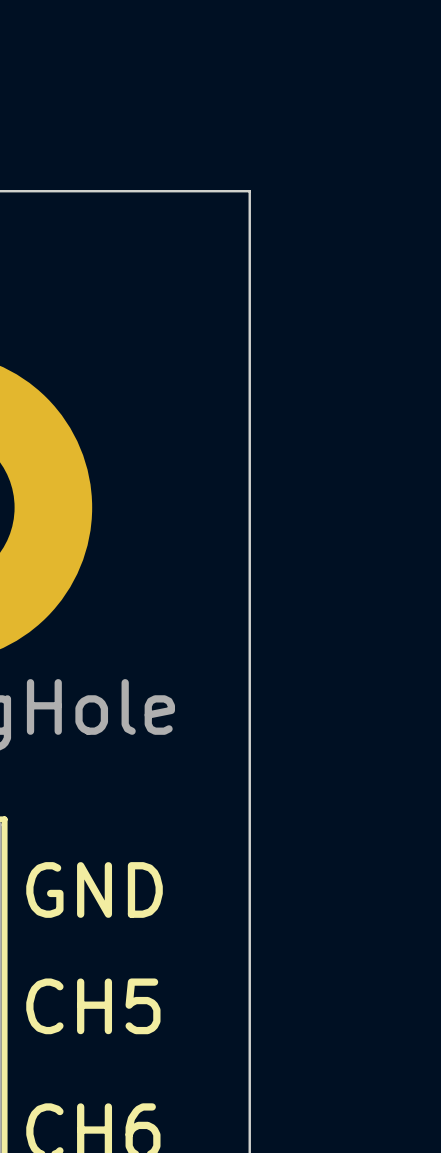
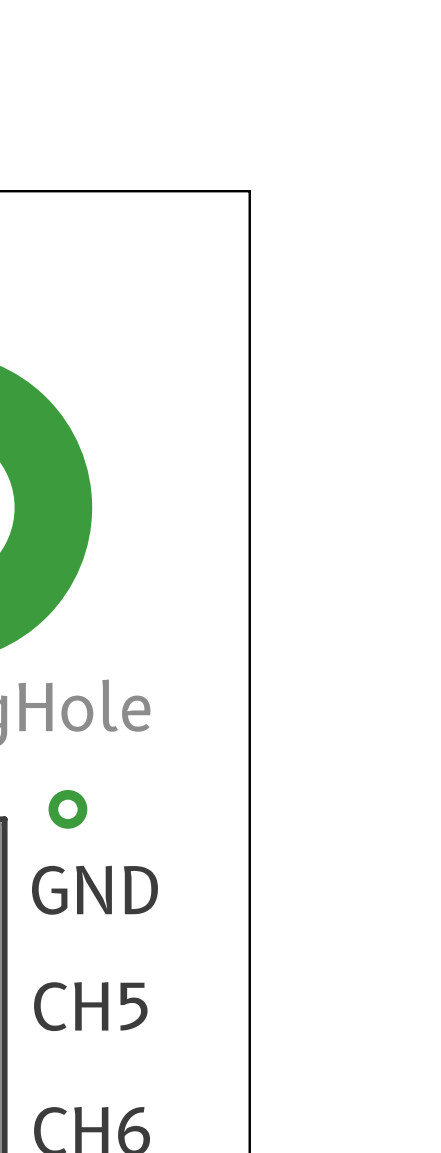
via: none -> (67, 809)

